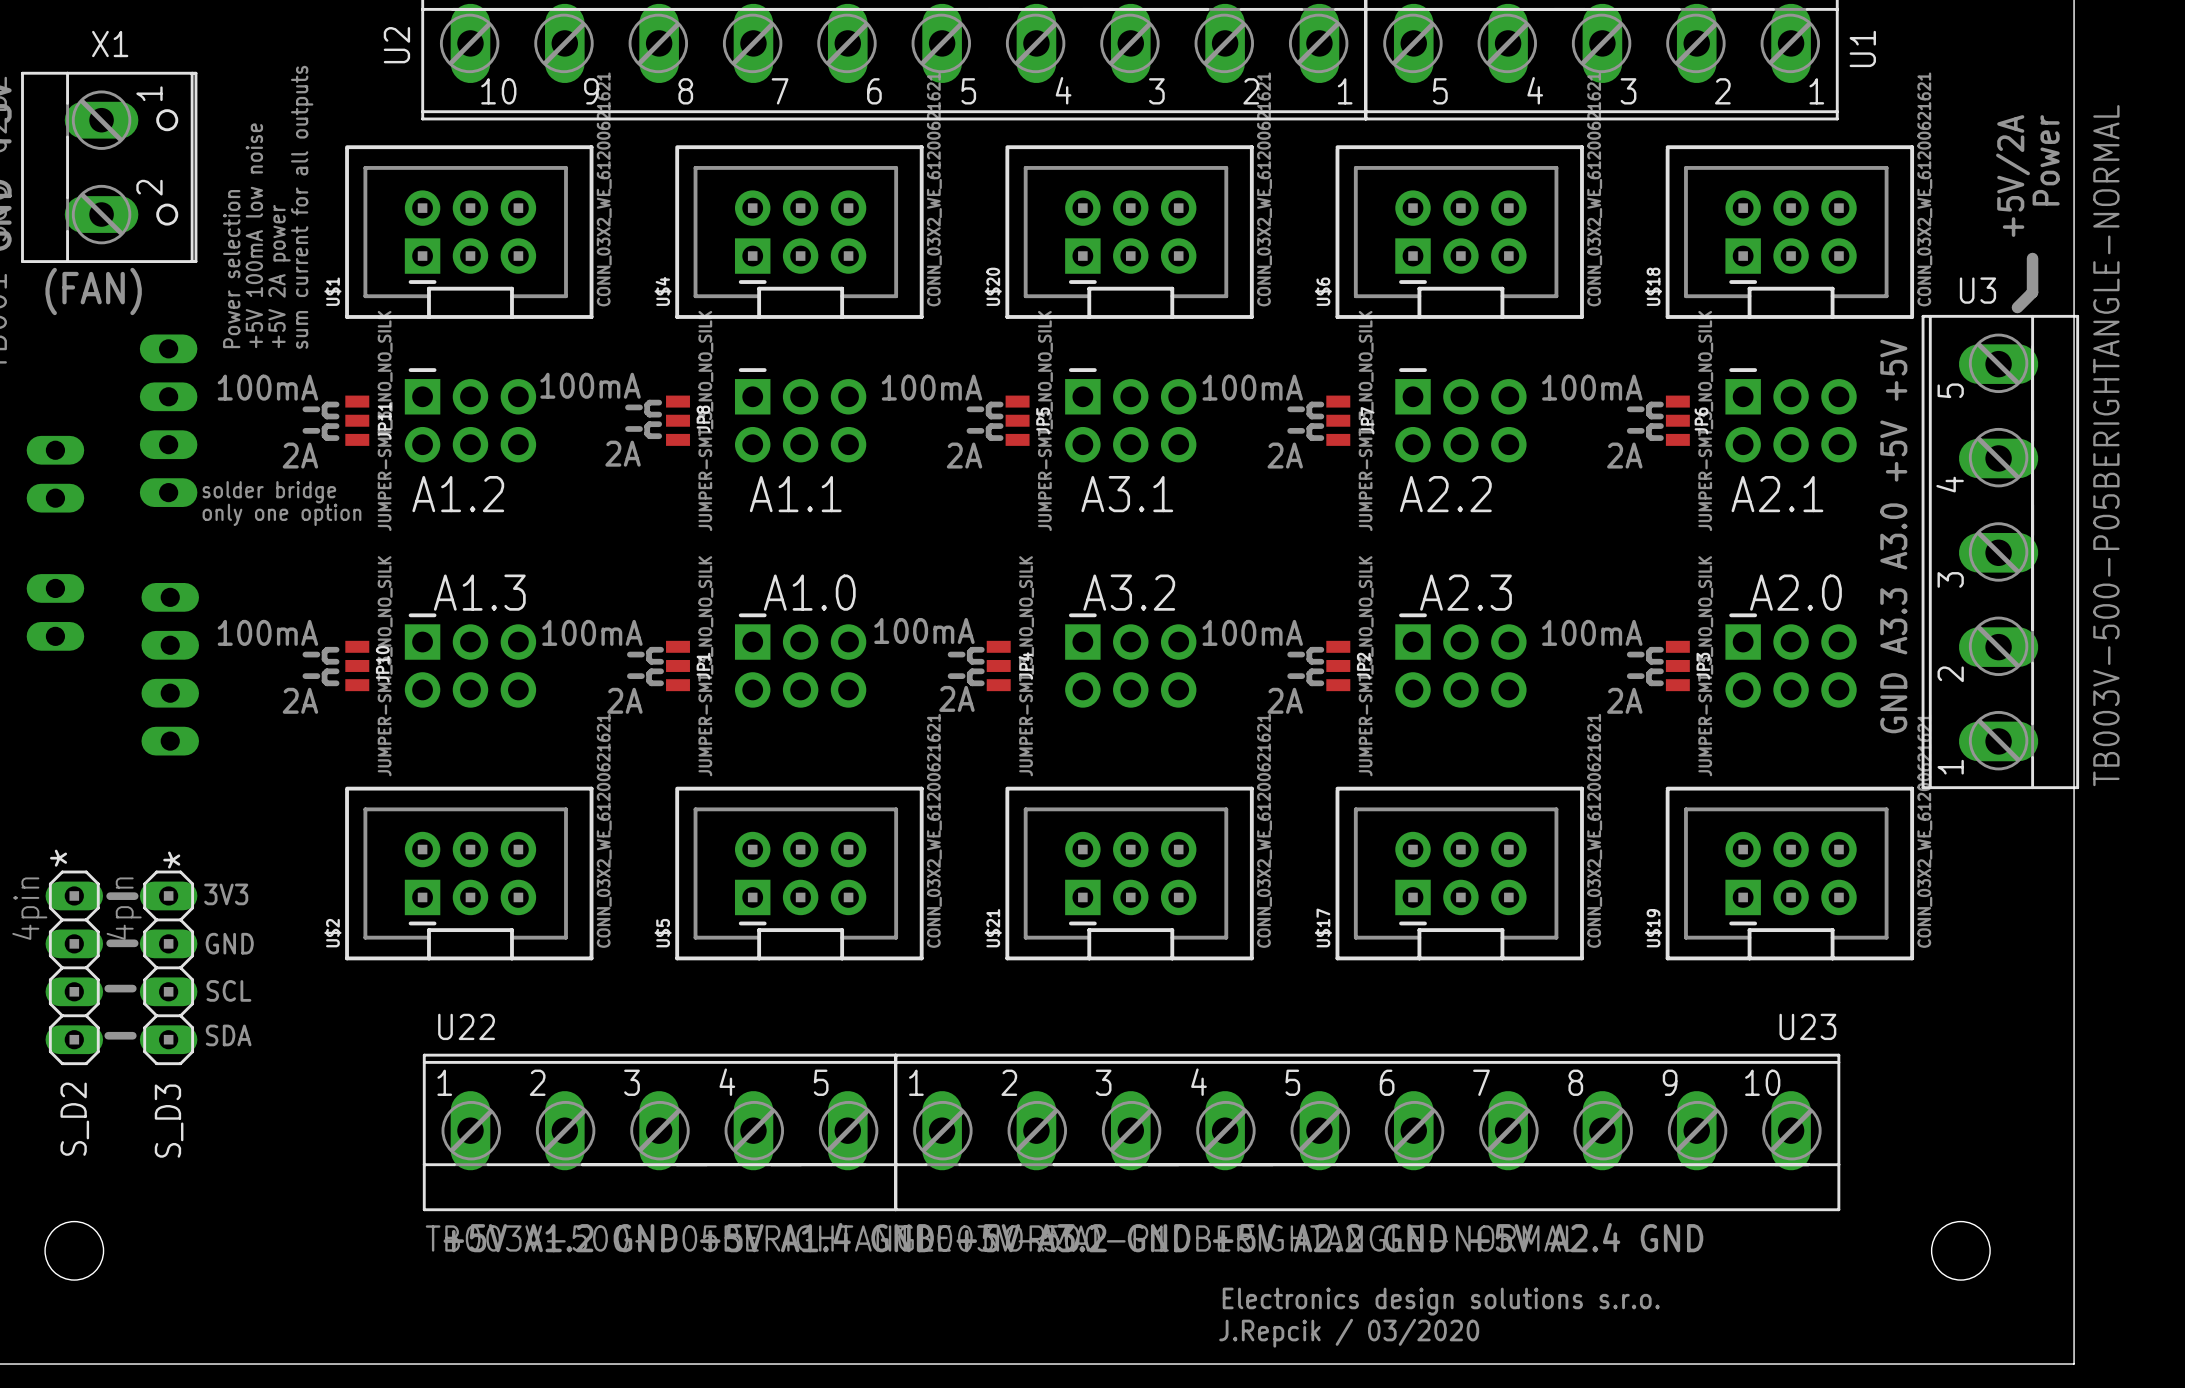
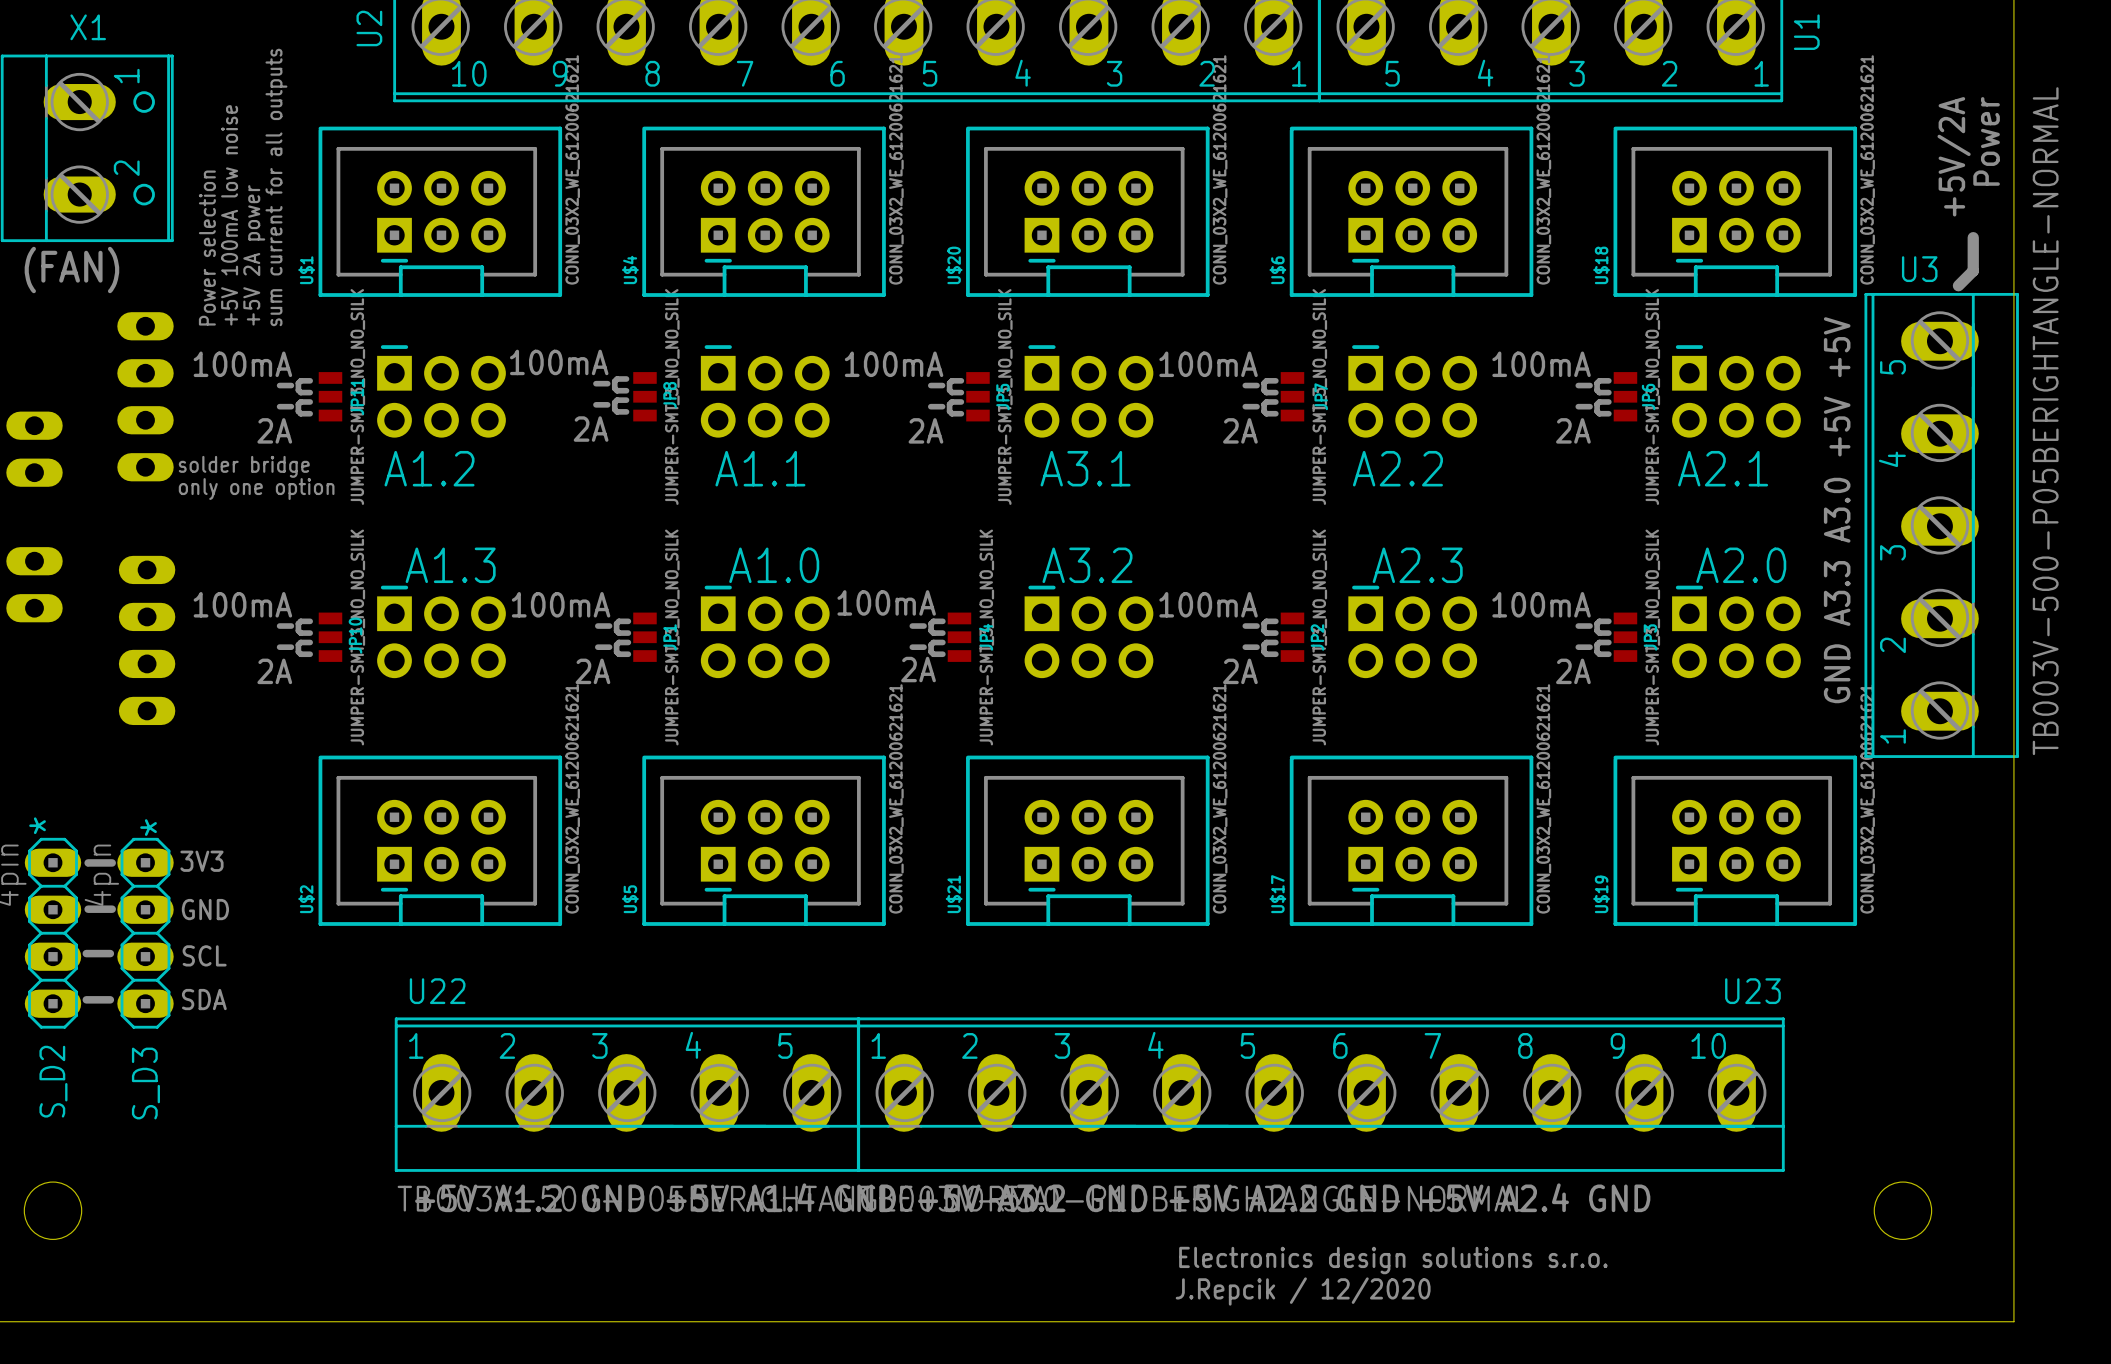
text: J.Repcik / 03/2020 (1349, 1333) -> J.Repcik / 12/2020 (1303, 1291)

